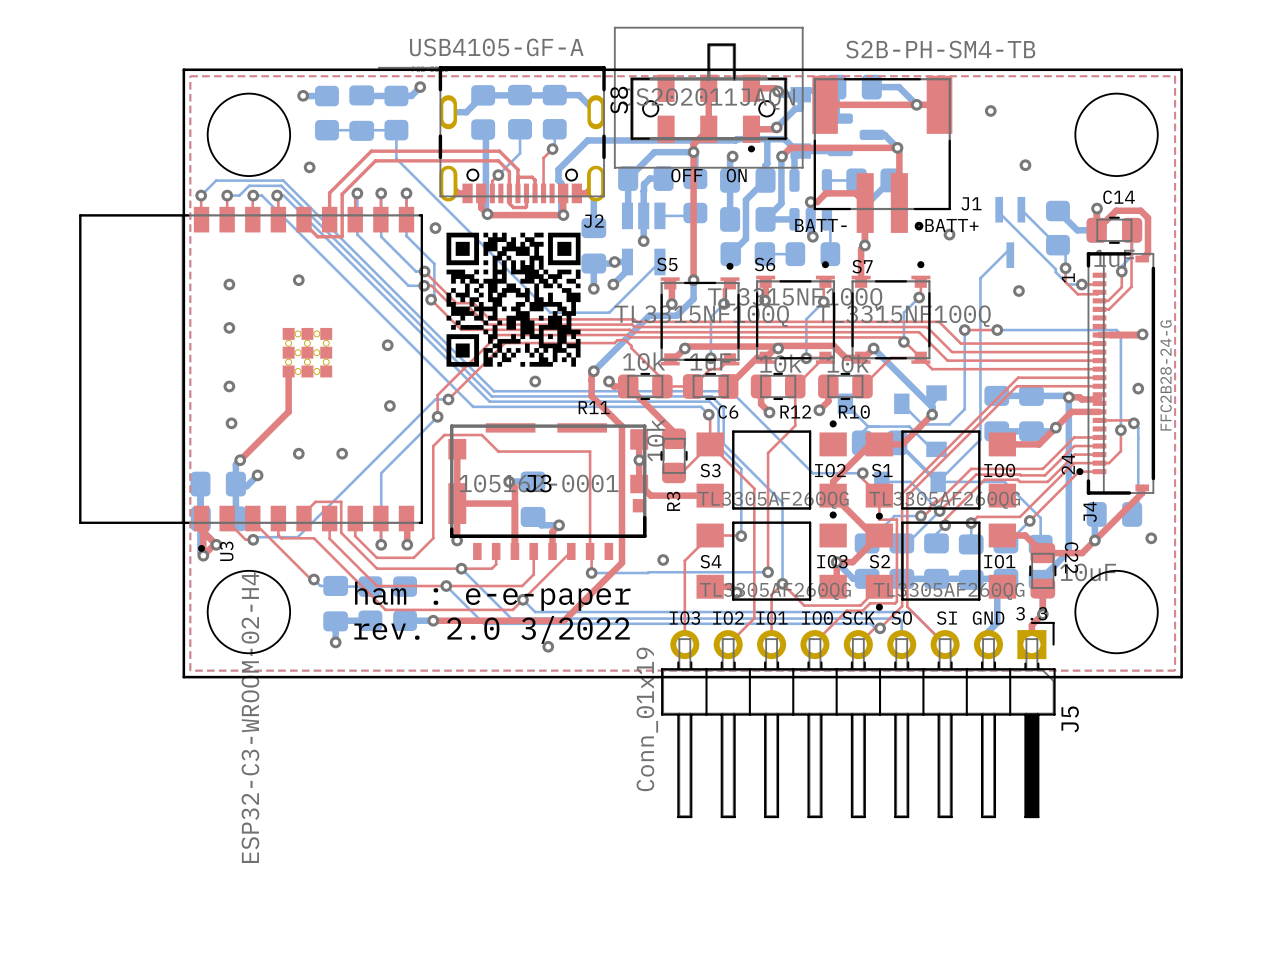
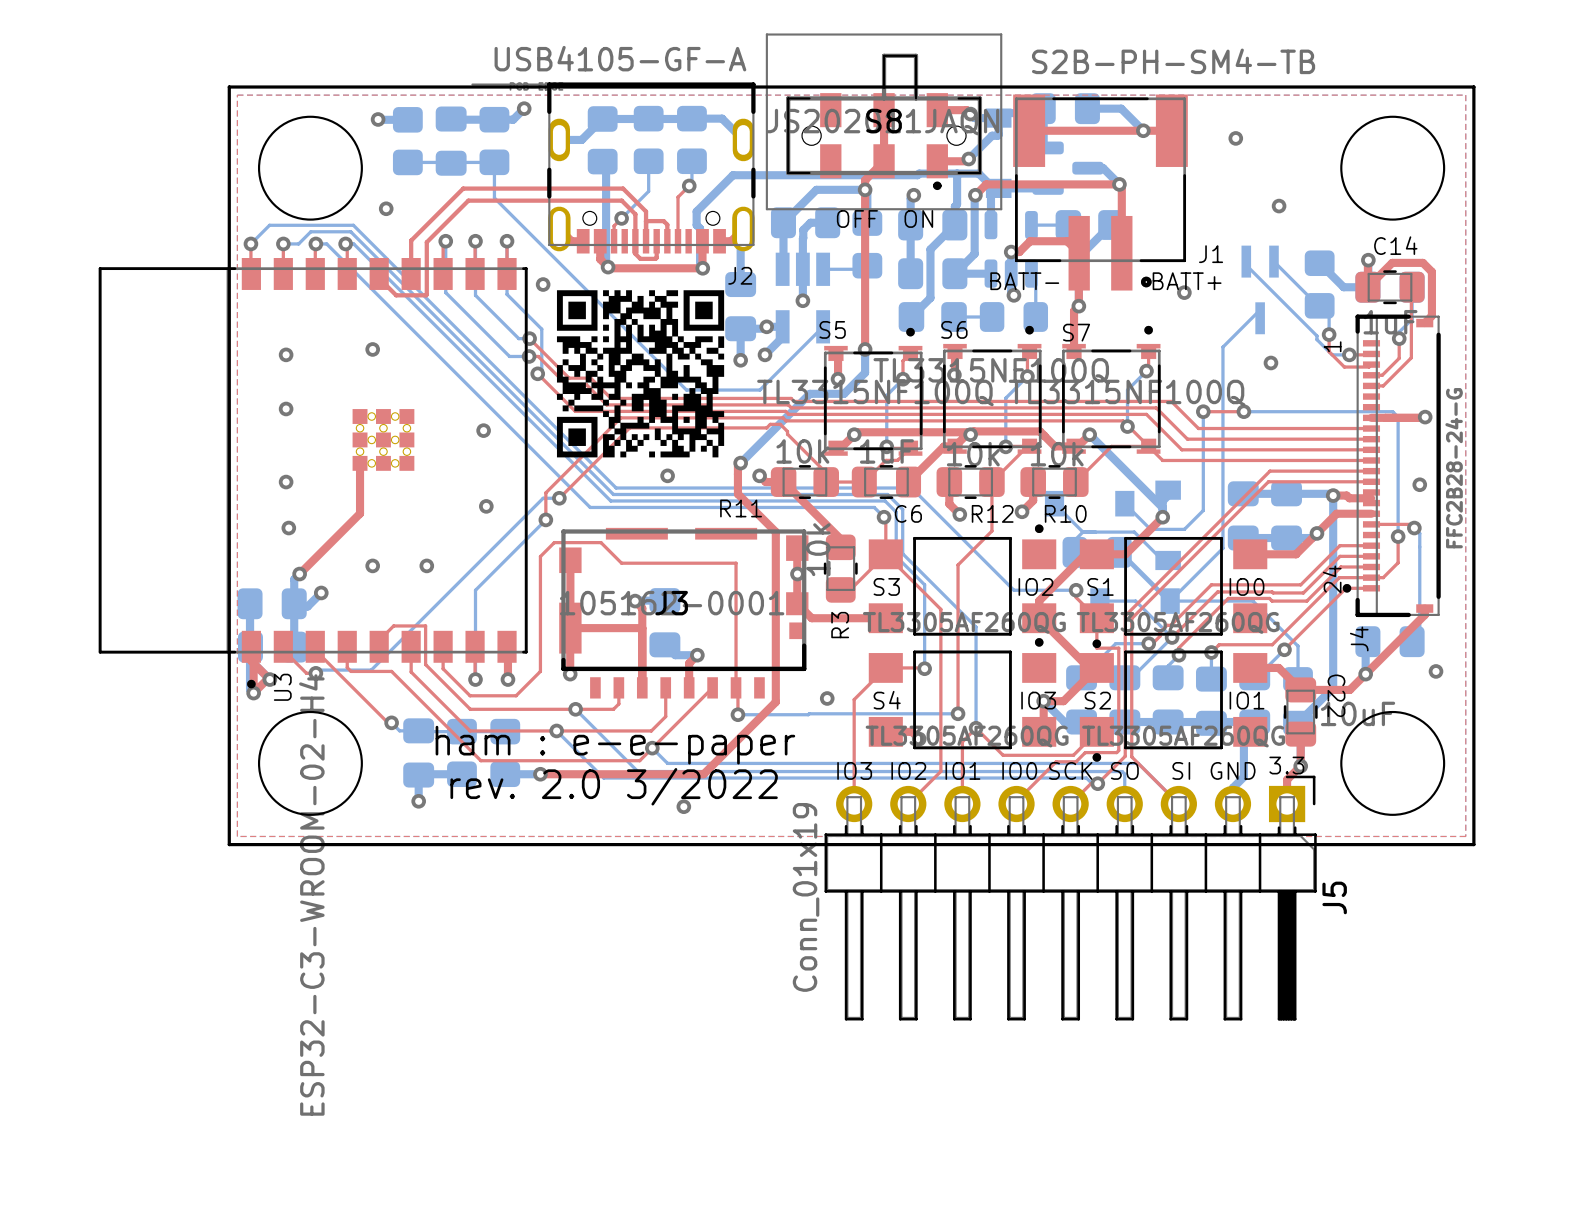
S8 name rotation: 0° (619, 100) -> 90° clockwise (884, 121)
S8 name position: S8 (619, 100) -> S8 (884, 121)

